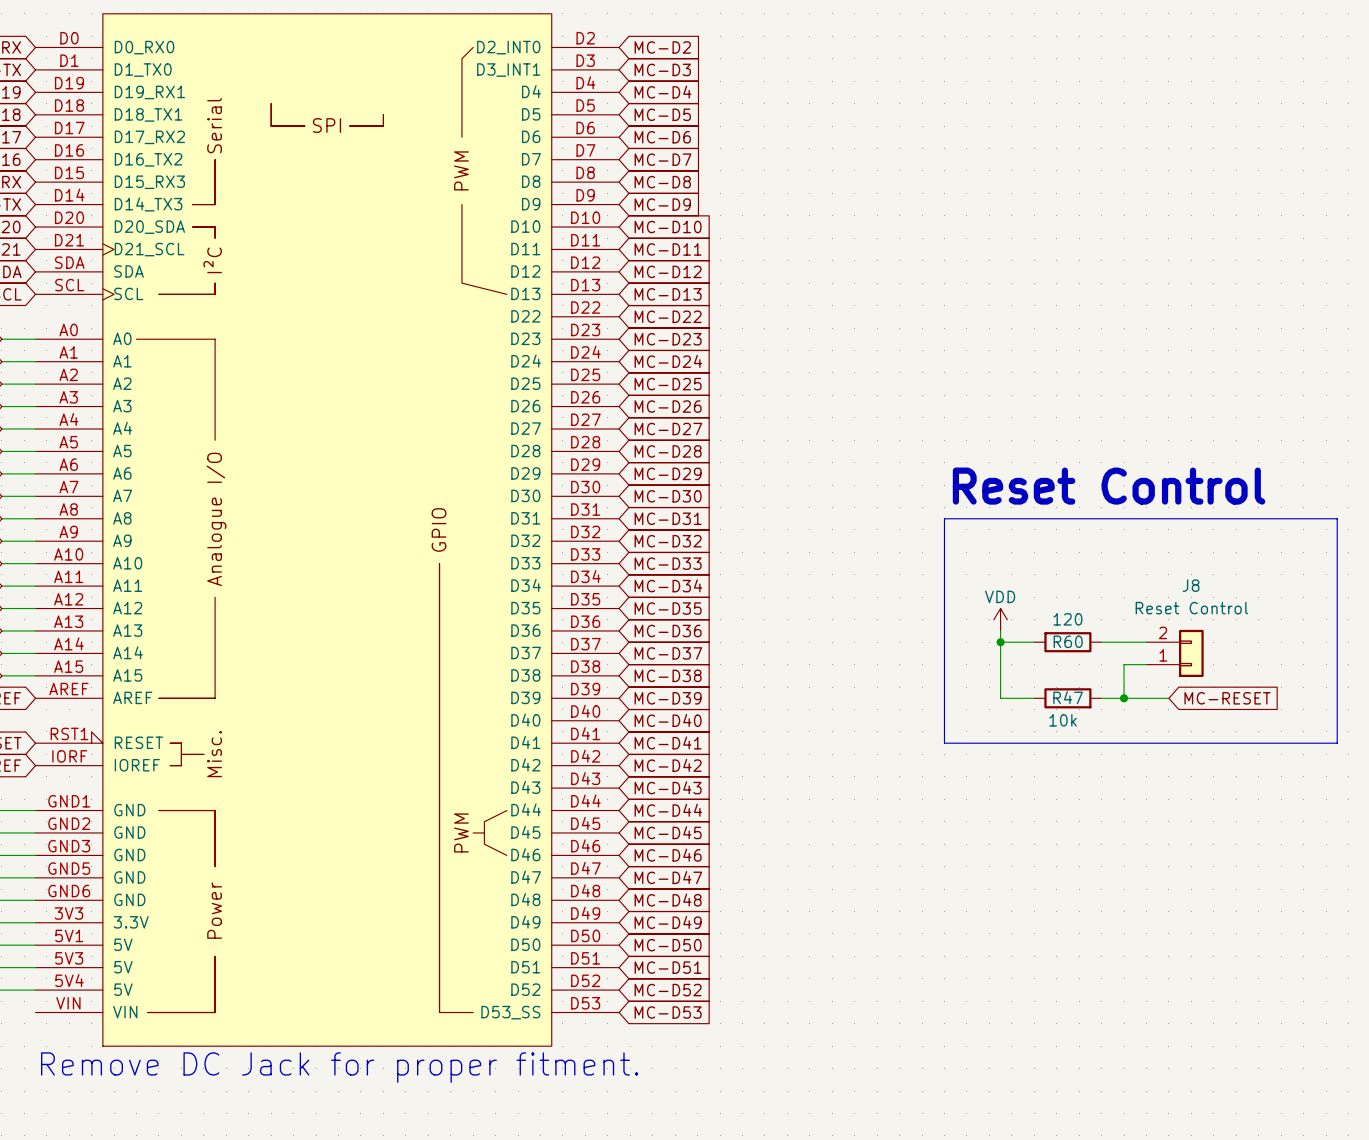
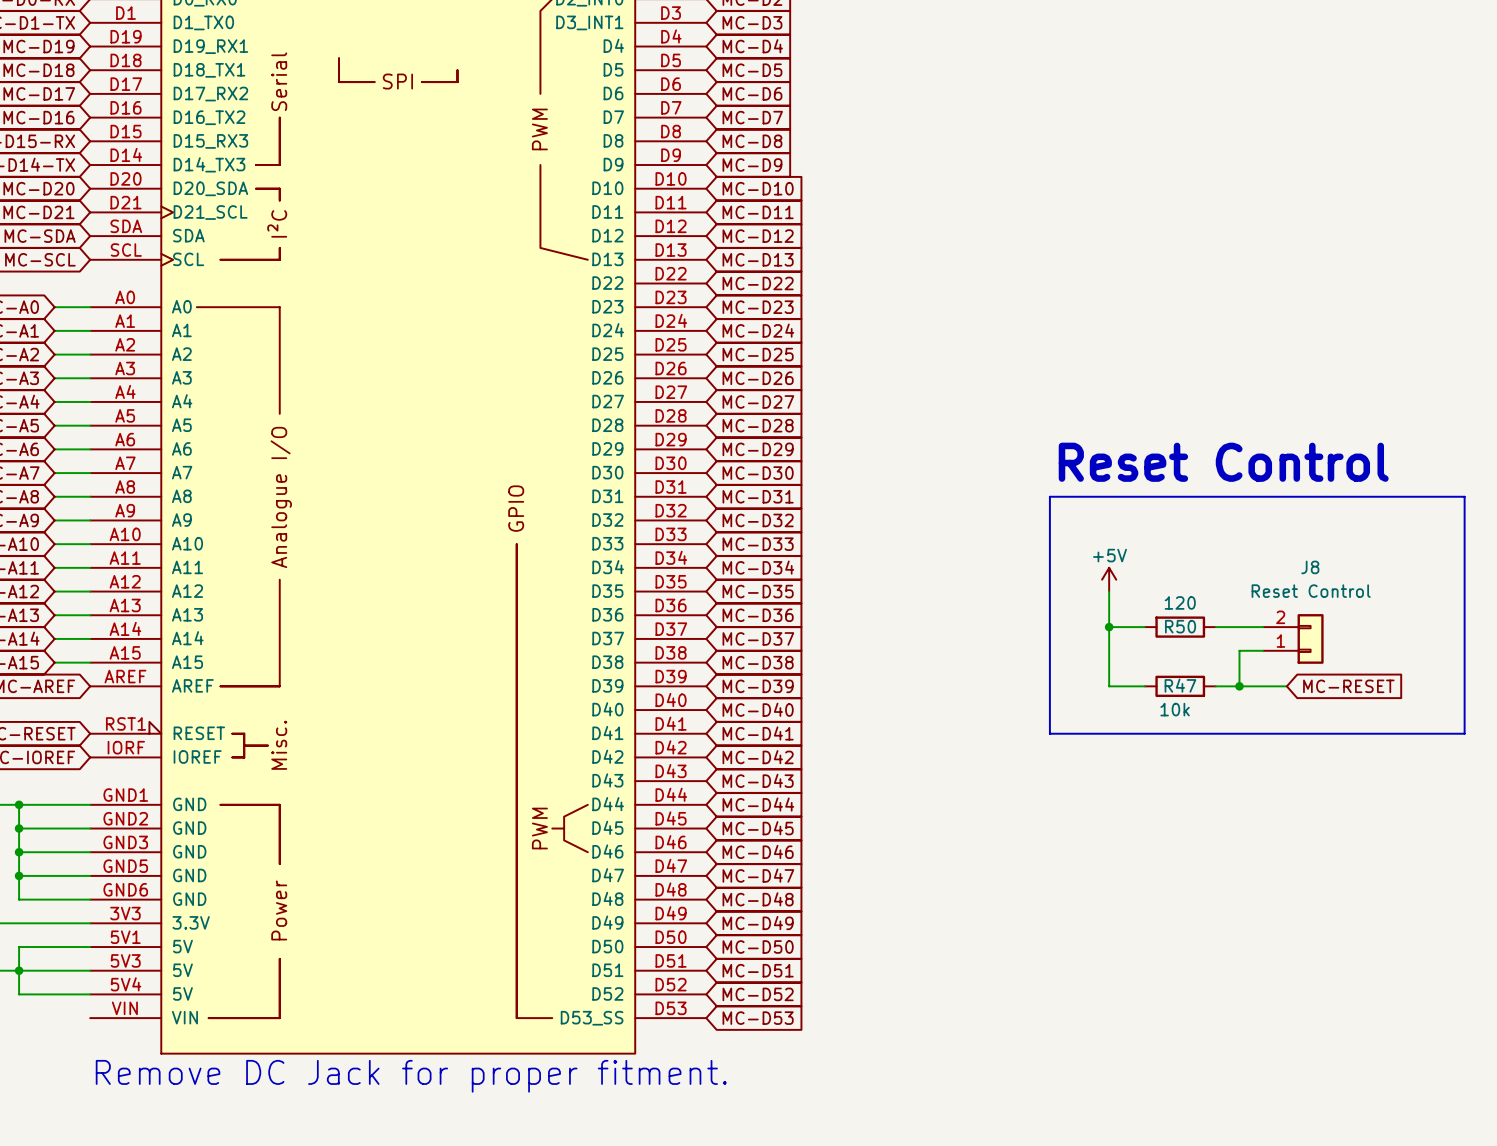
power symbol: none -> +5V (1109, 579)
power symbol: VDD (1000, 619) -> none
R60 name: R60 (1068, 641) -> R50 (1180, 626)

